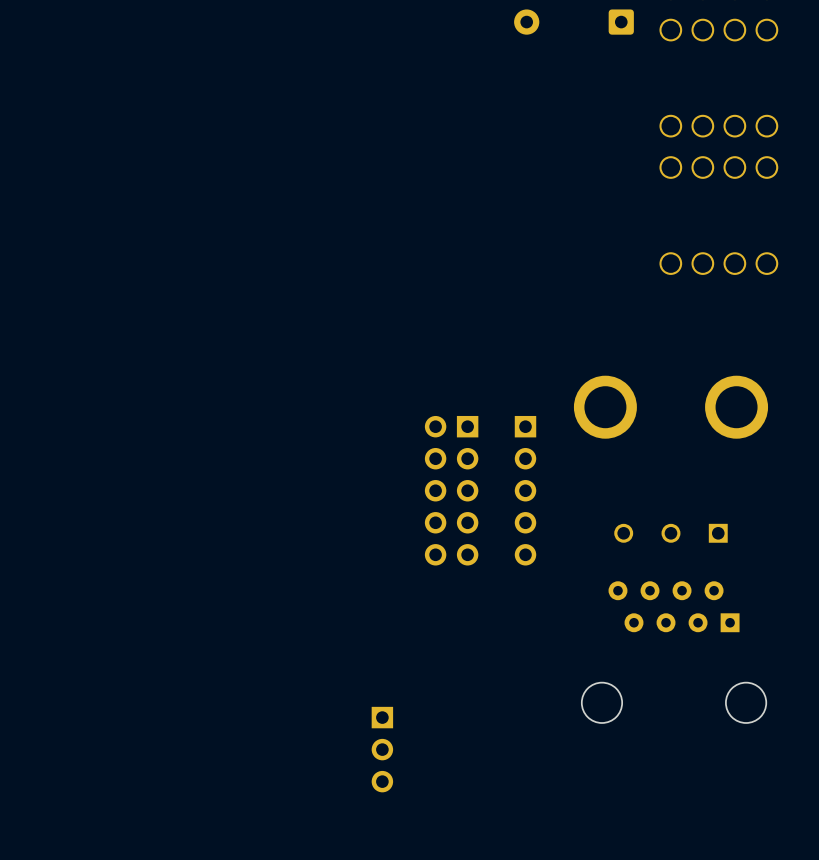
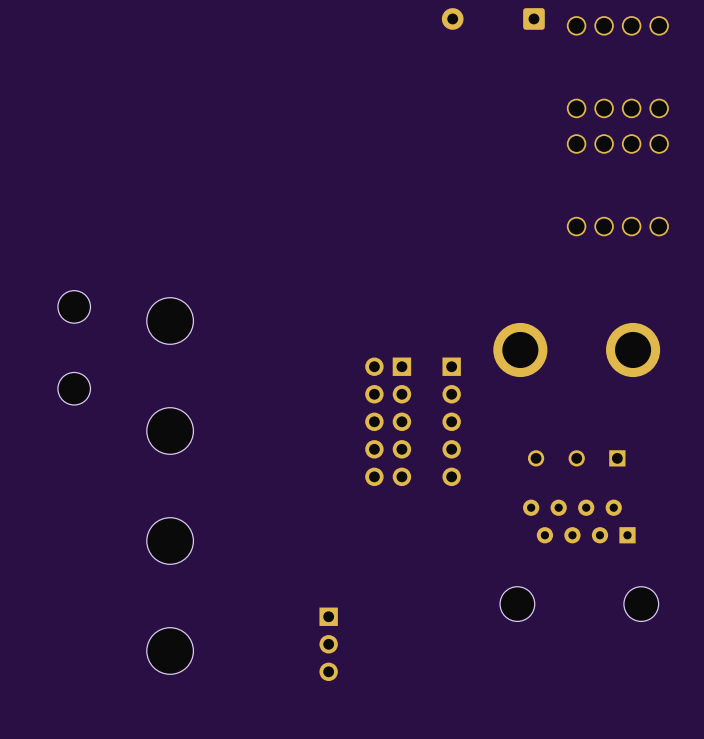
part: none -> (74, 306)
part: none -> (170, 321)
part: none -> (74, 388)
part: none -> (170, 431)
part: none -> (170, 541)
part: none -> (170, 651)

